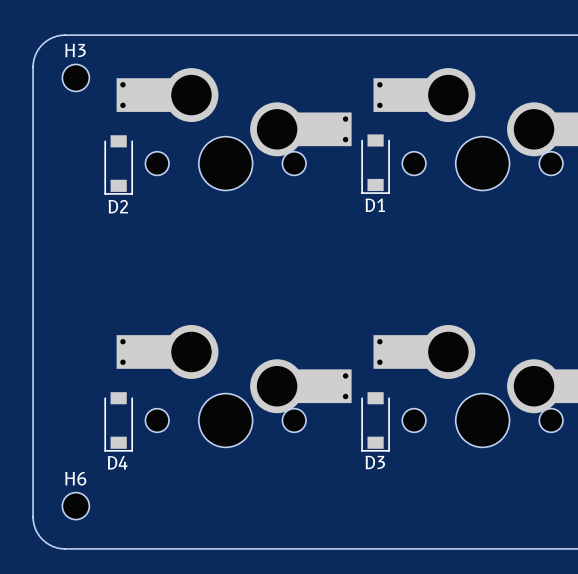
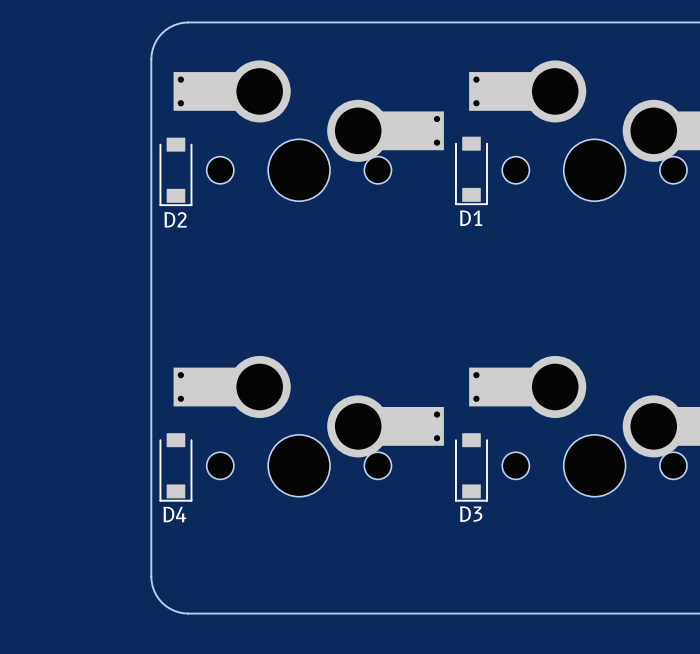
board edge: (129, 35) (56, 36) (45, 41) (39, 47) (35, 54) (33, 67) (34, 525) (42, 539) (56, 547) (129, 548) -> (188, 22) (174, 25) (162, 33) (154, 45) (151, 59) (151, 581) (156, 595) (165, 605) (178, 612) (188, 613)
H3: (75, 77) -> none
H6: (75, 506) -> none

